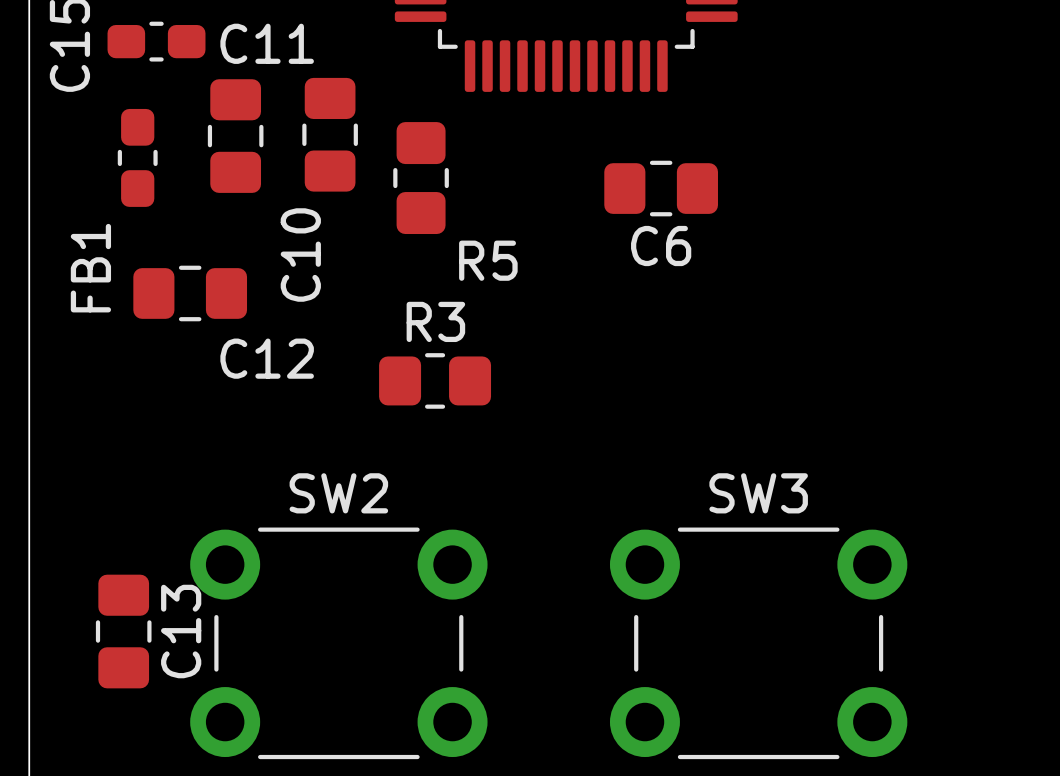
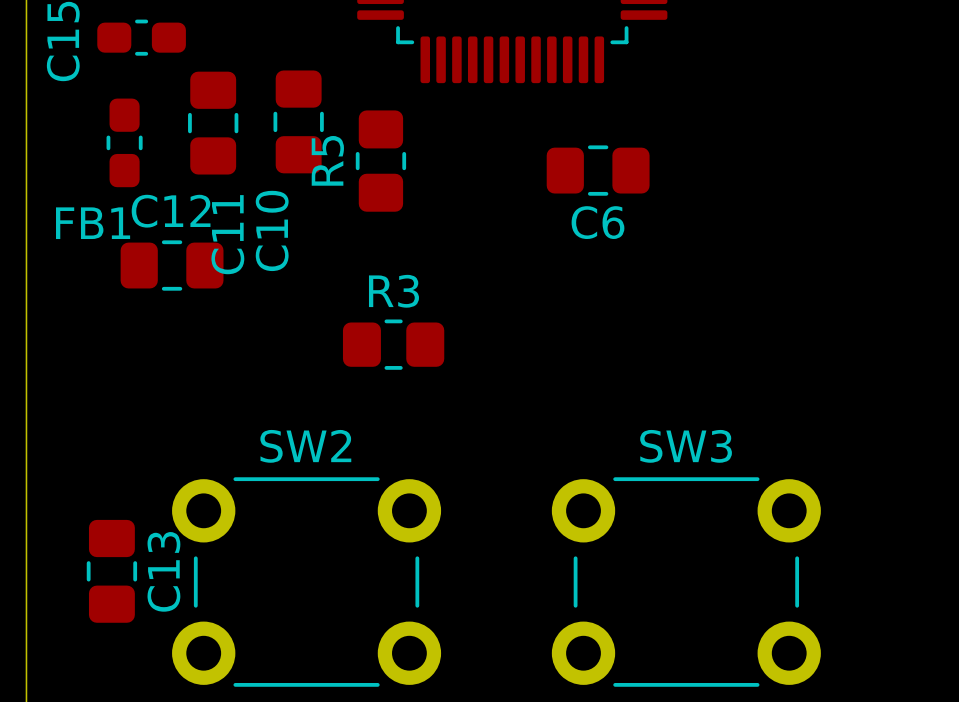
C11 name rotation: 0° (267, 43) -> 90° counterclockwise (227, 234)
C11 name position: C11 (267, 43) -> C11 (227, 234)
R5 name rotation: 0° (488, 260) -> 90° counterclockwise (327, 160)
R5 name position: R5 (488, 260) -> R5 (327, 160)
FB1 name rotation: 0° (90, 268) -> 90° clockwise (93, 223)
C12 name position: C12 (267, 358) -> C12 (171, 211)

